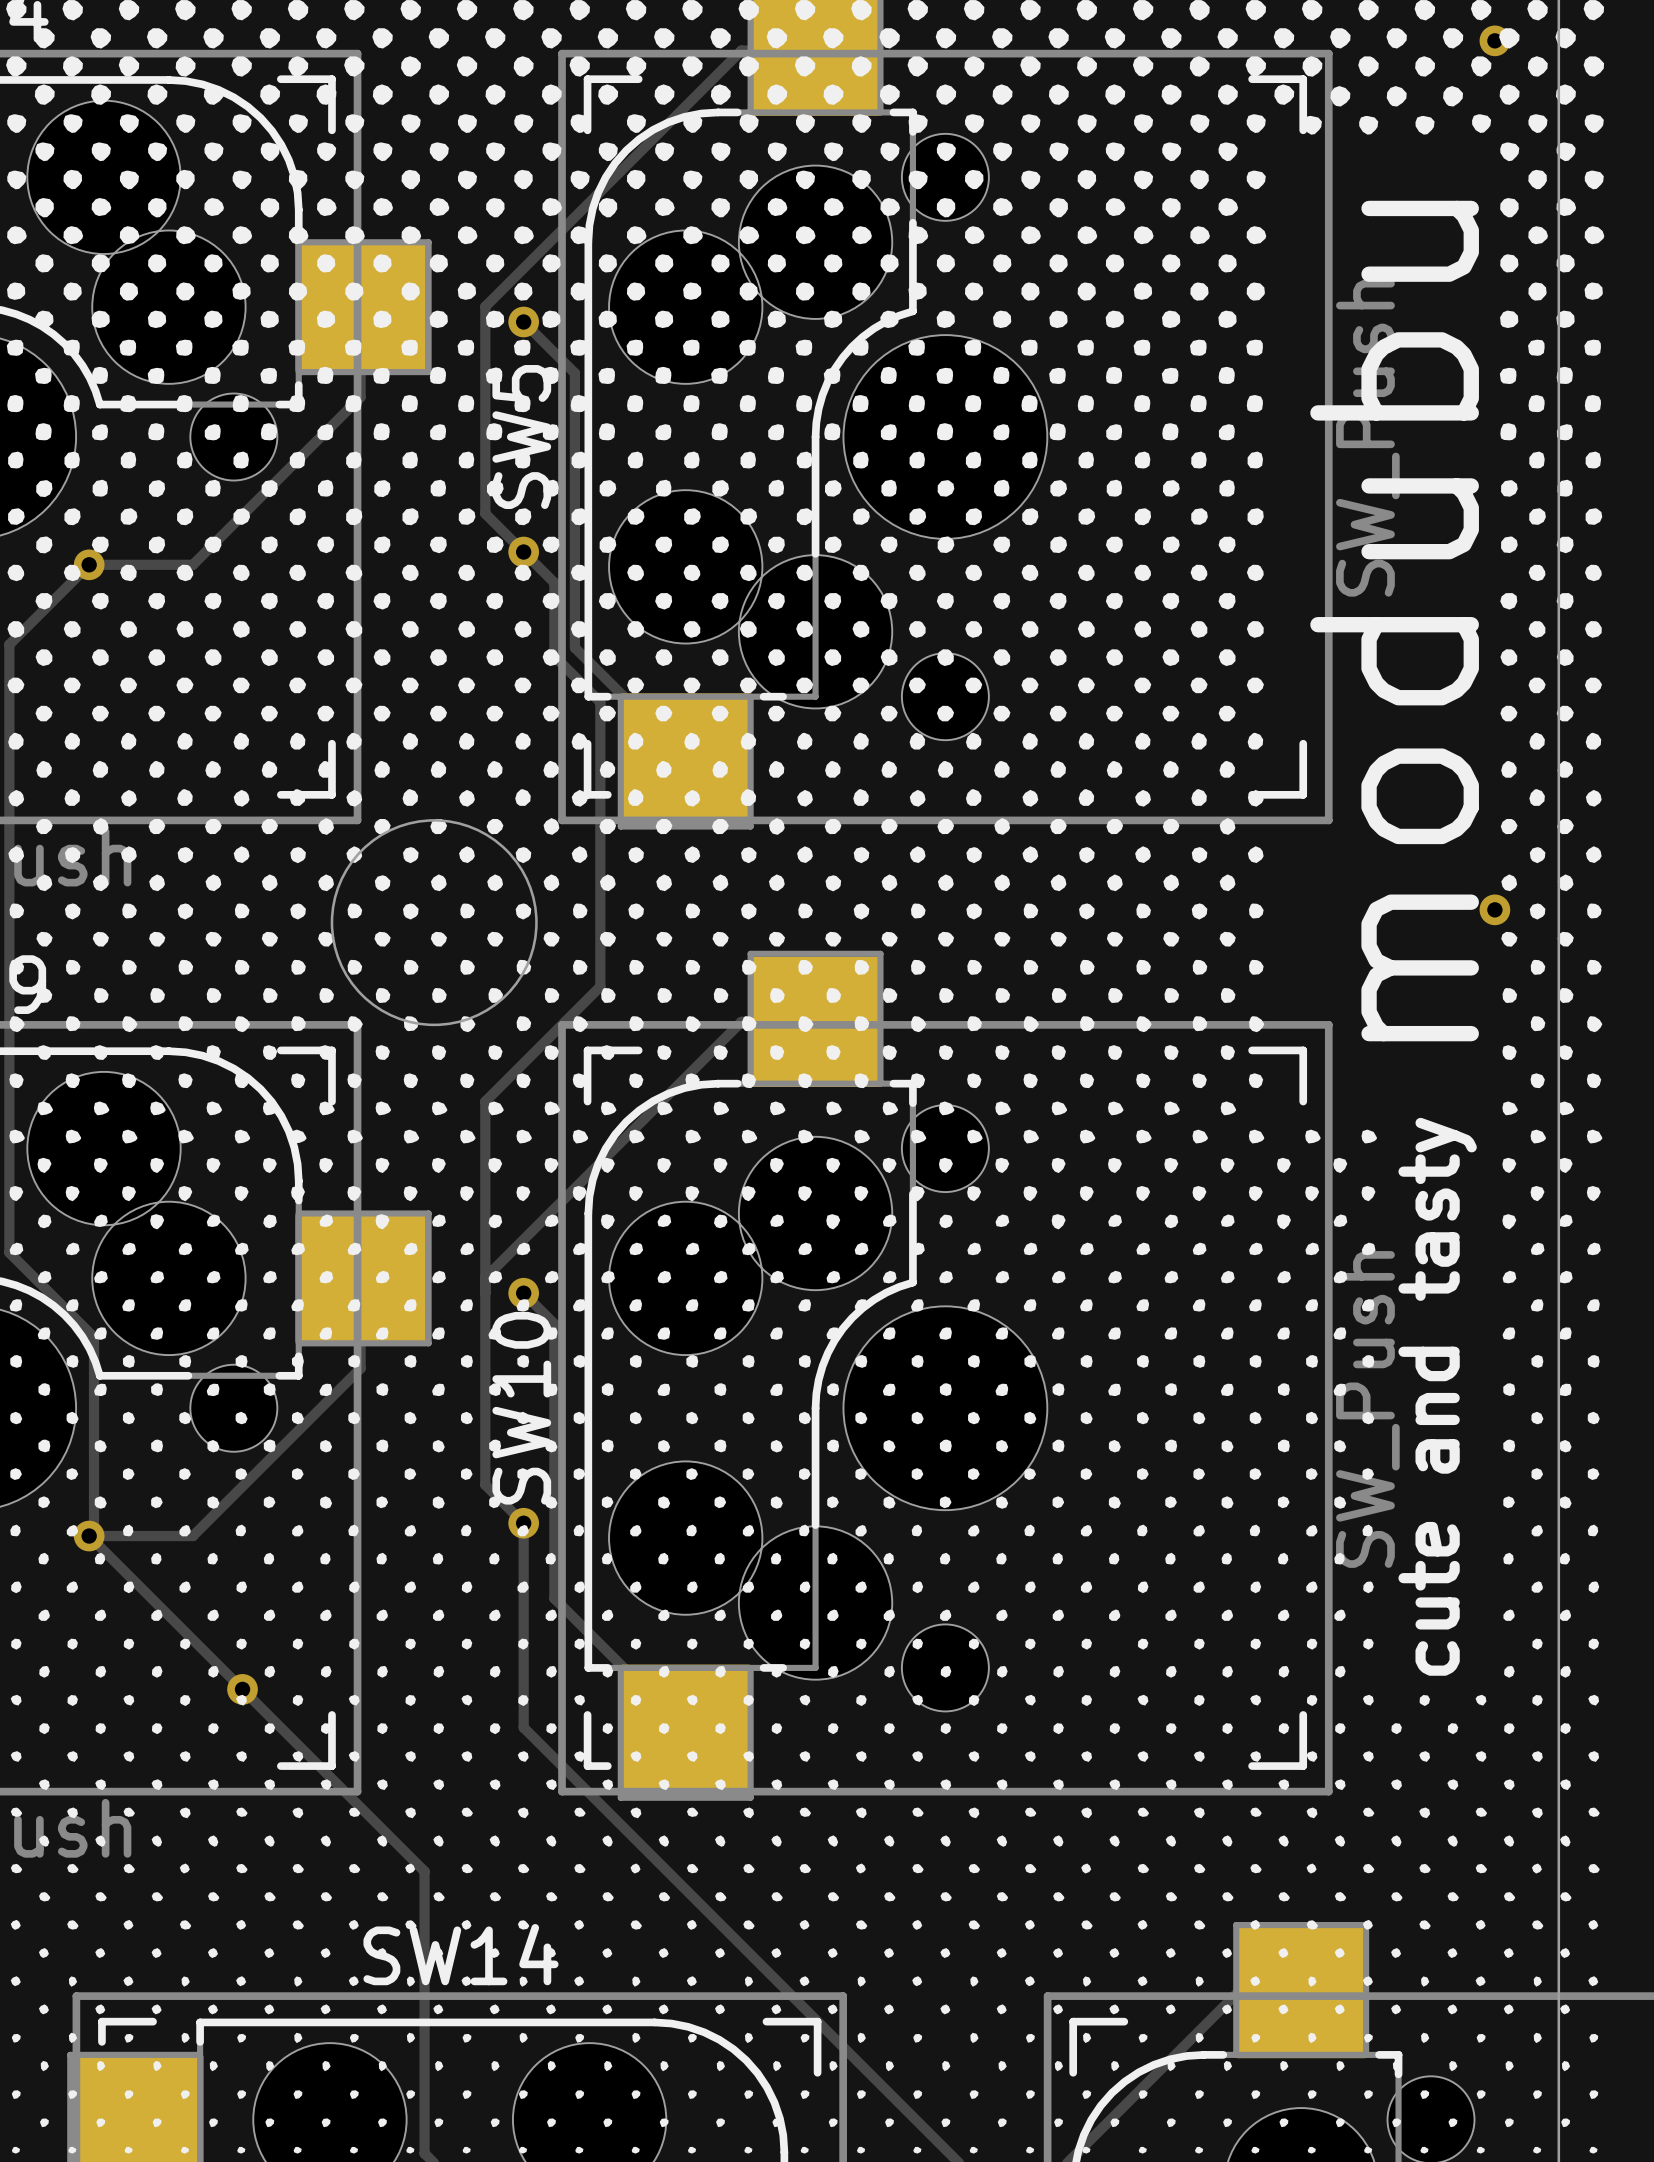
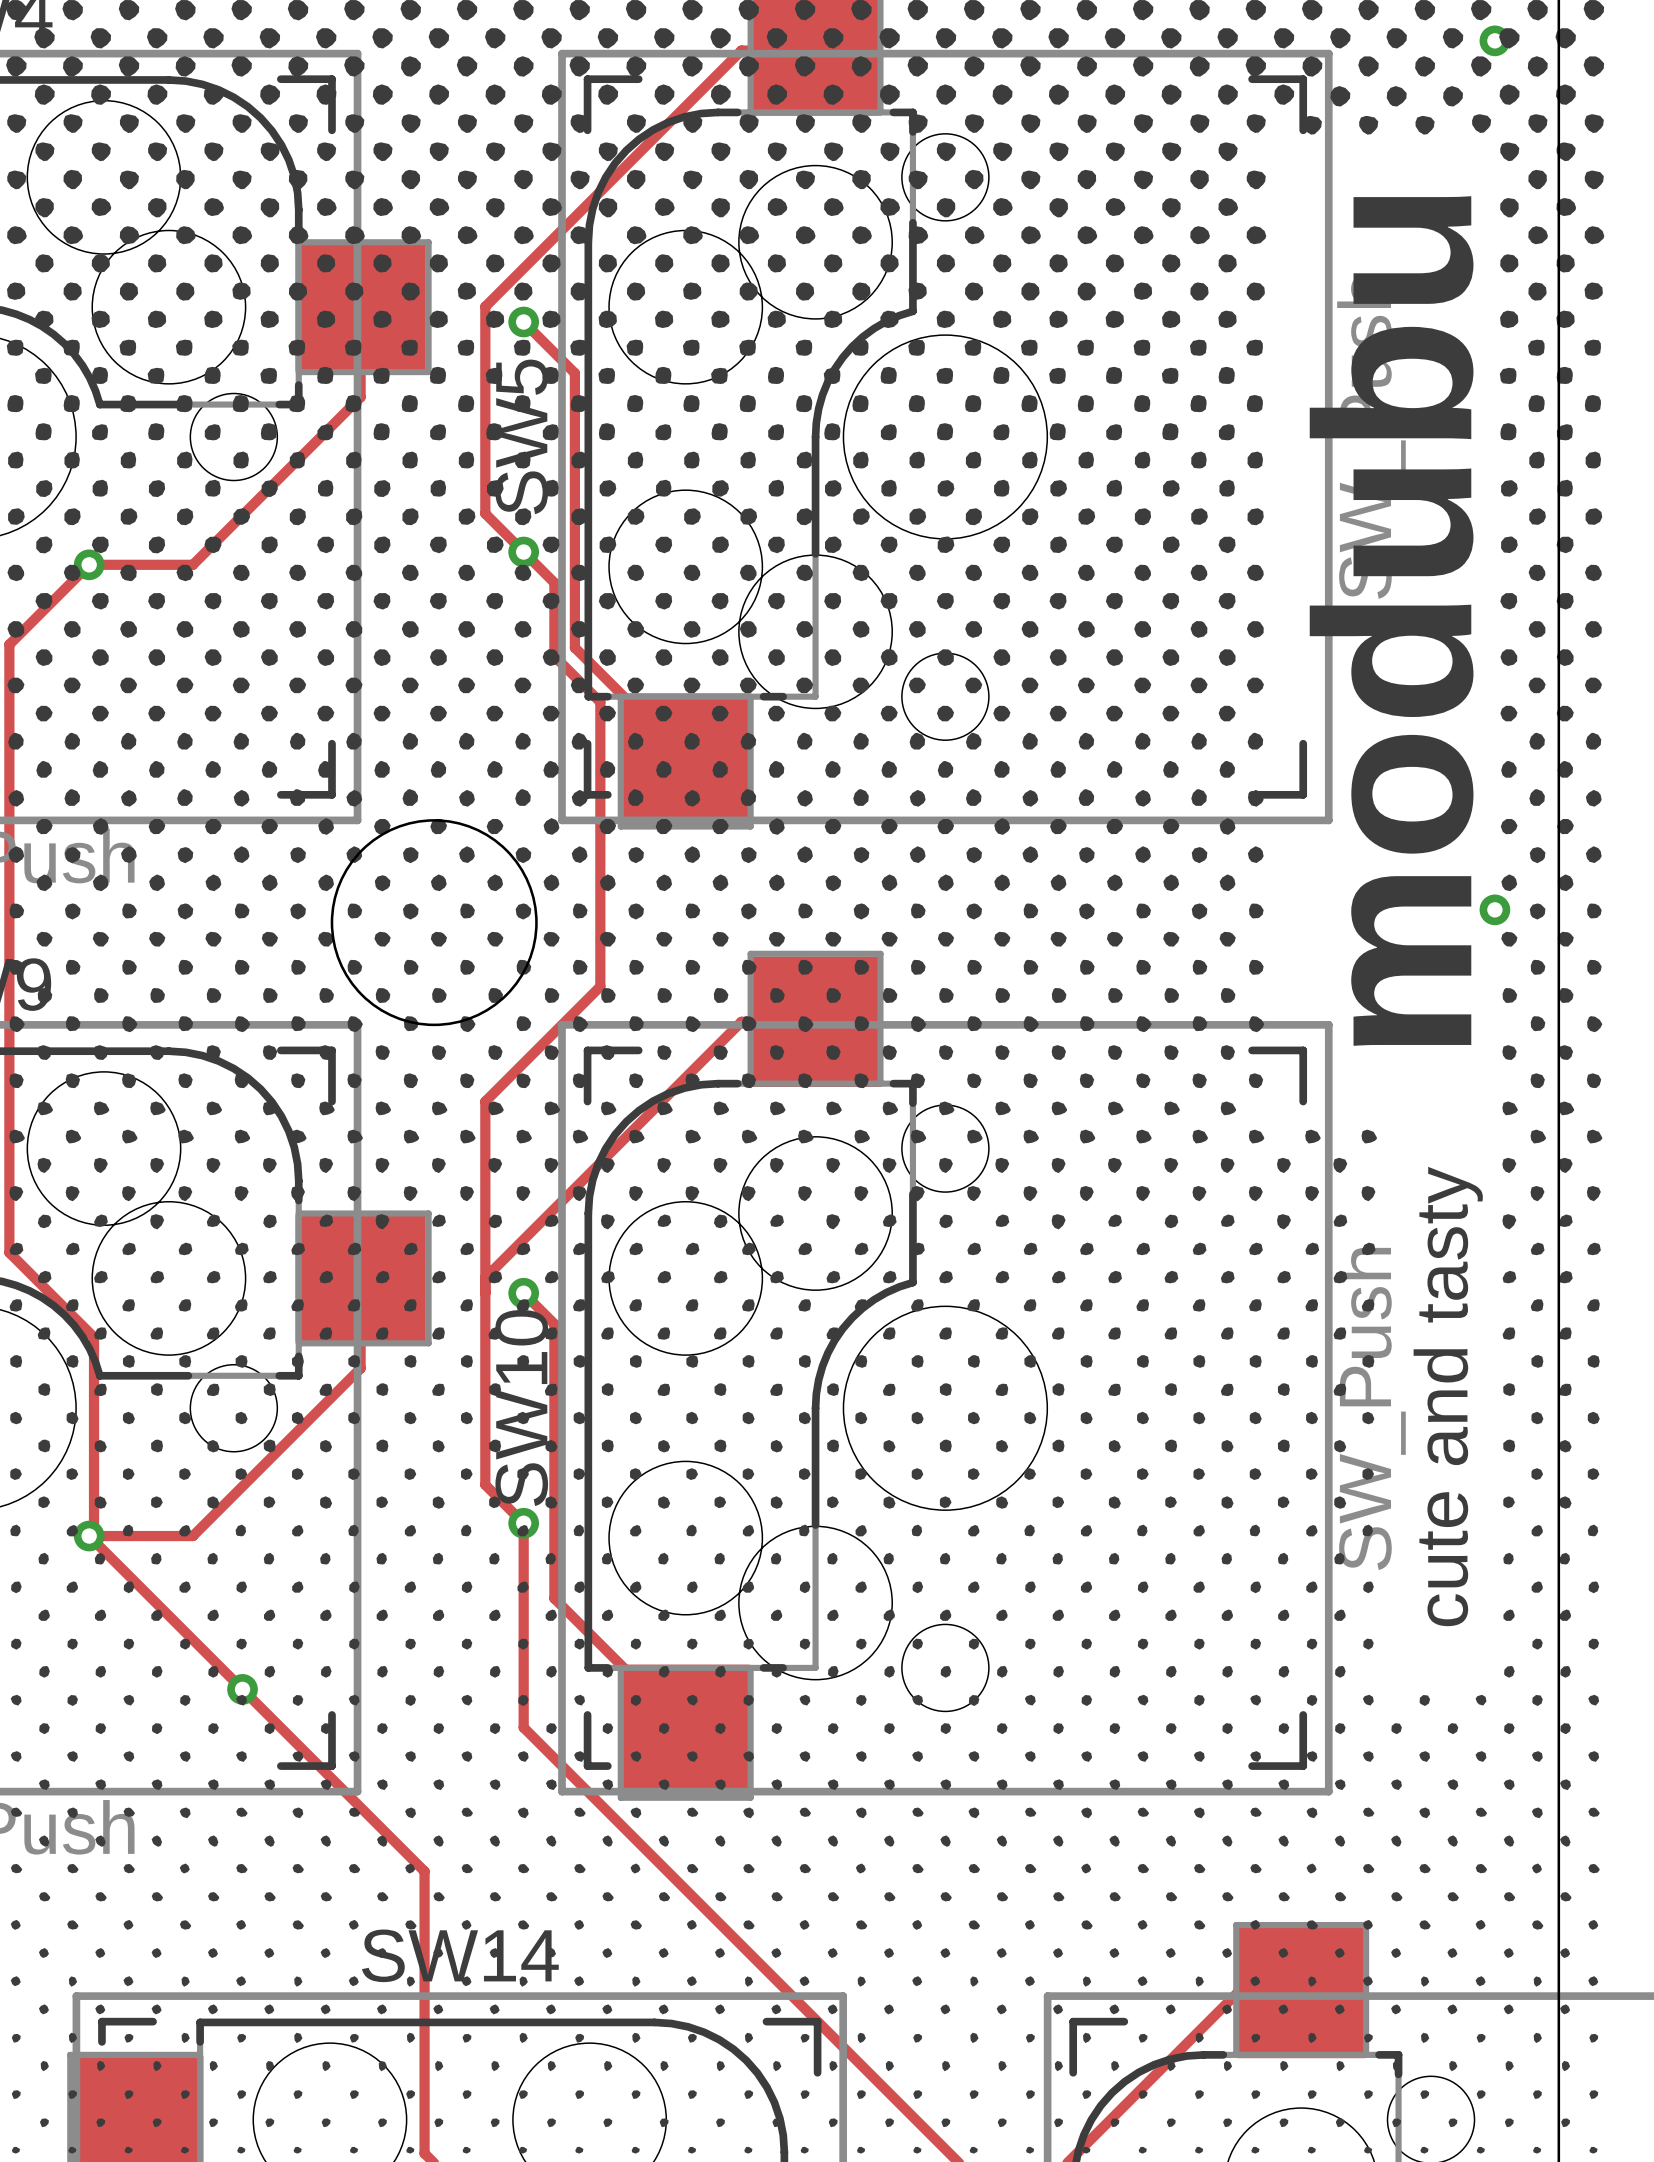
text position: cute and tasty (1437, 1396) -> cute and tasty (1448, 1396)

